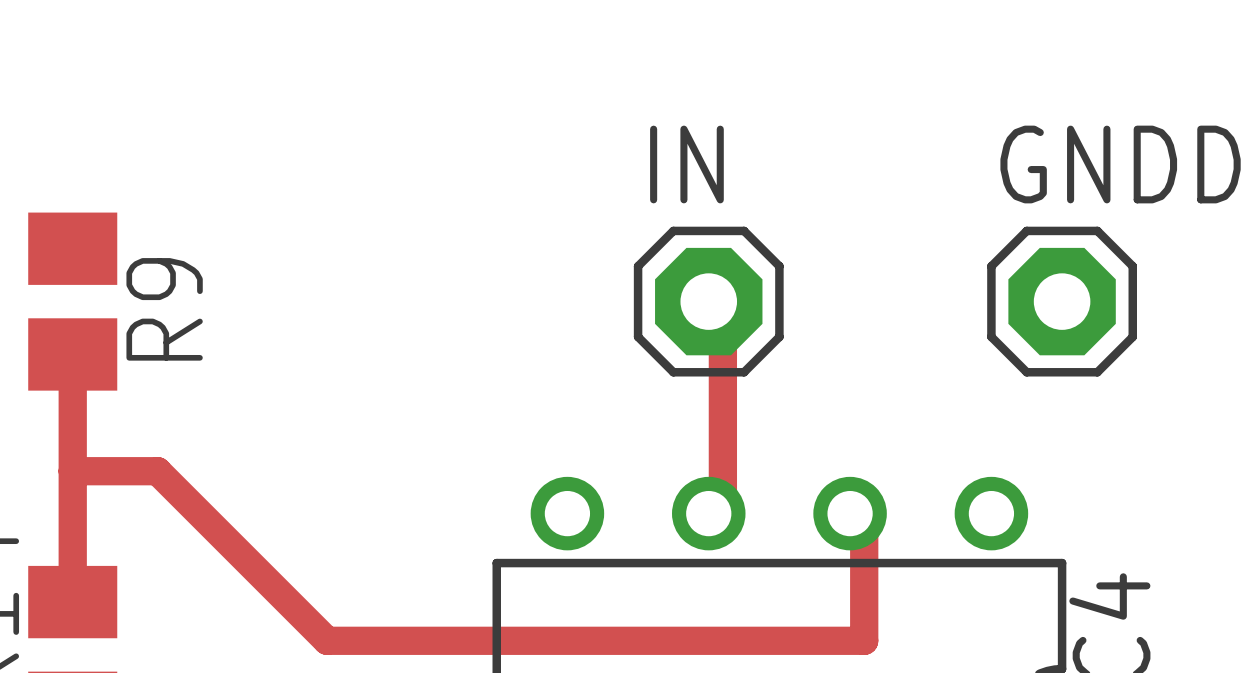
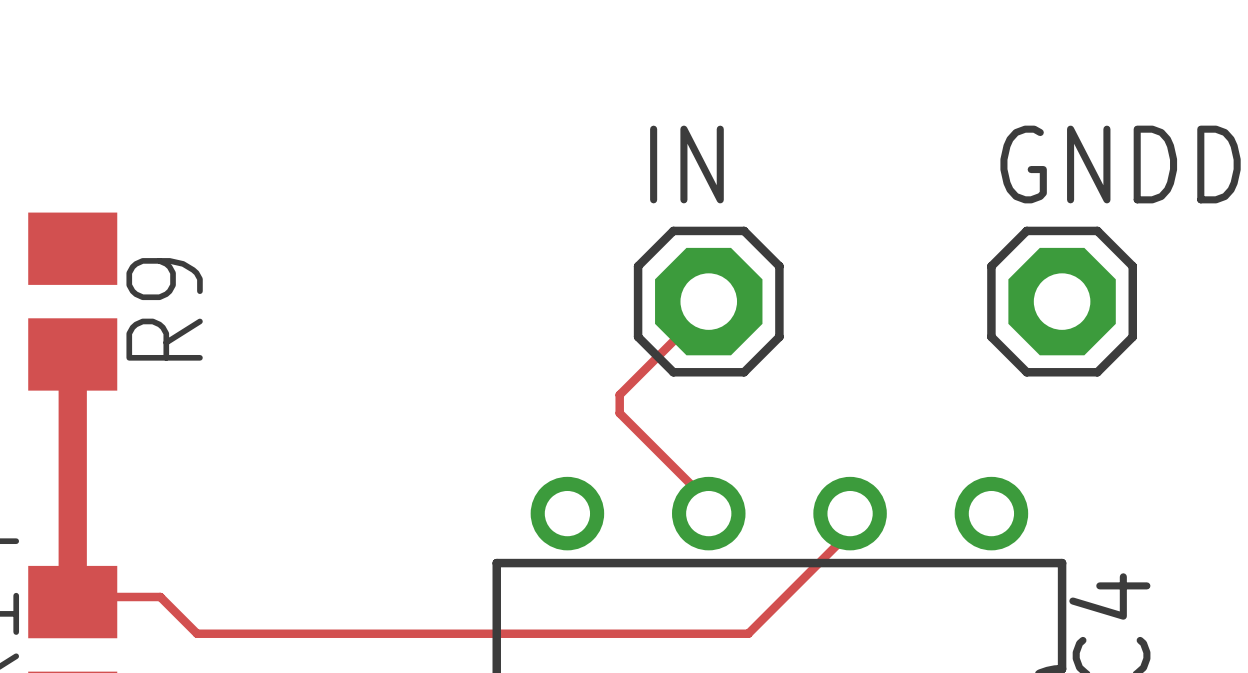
track: (708, 301) (722, 301) (722, 499) (708, 513) -> (708, 301) (711, 303) (619, 394) (619, 413) (693, 486) (693, 505) (708, 513)
track: (72, 471) (157, 471) (327, 640) (864, 640) (864, 527) (850, 513) -> (72, 354) (68, 358) (68, 596) (72, 602) (86, 596) (160, 596) (197, 633) (748, 633) (840, 541) (840, 523) (850, 513)

